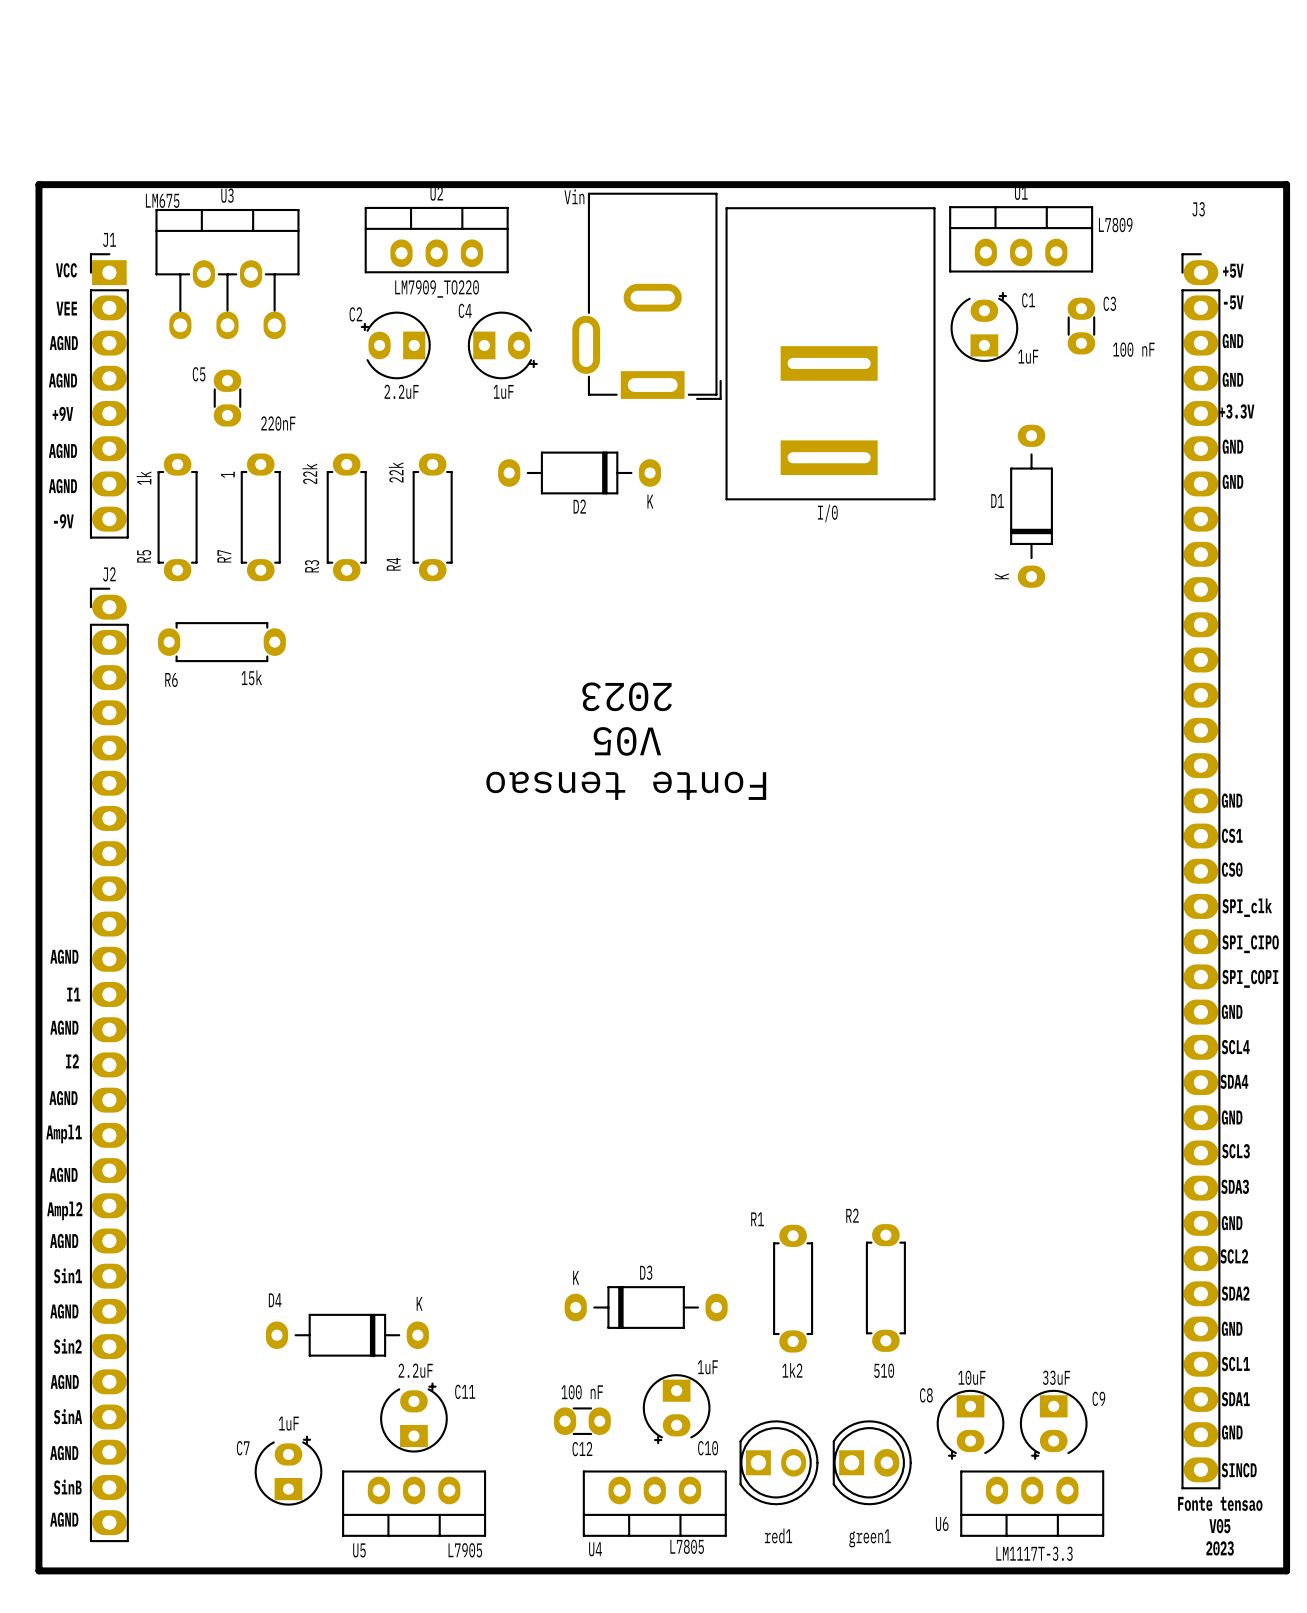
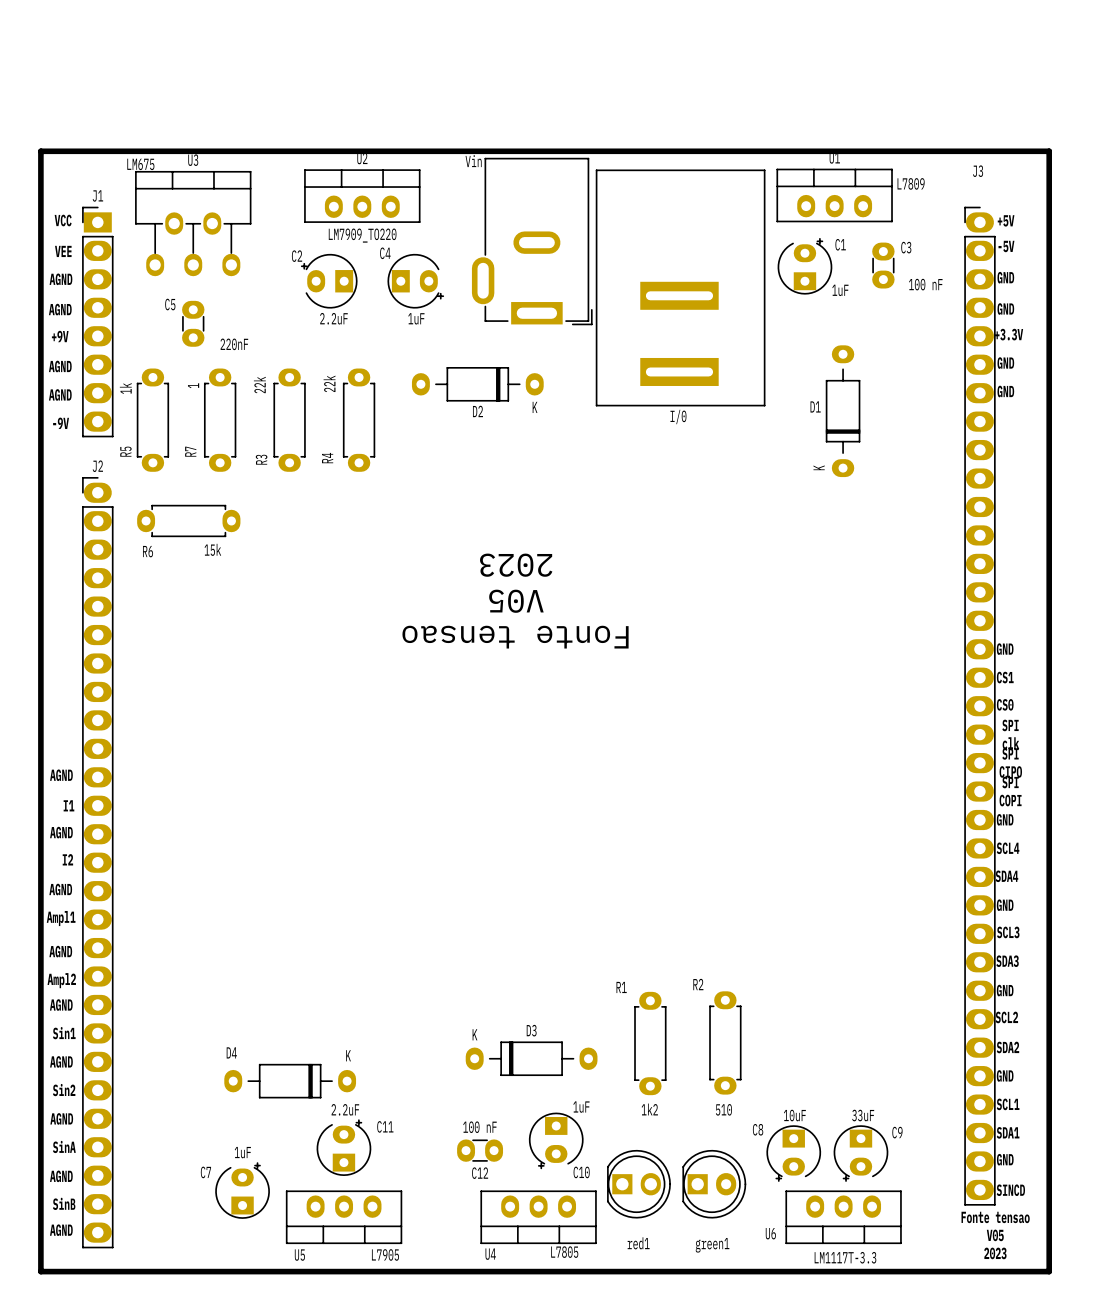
text: none -> SPI (1010, 725)
text: SPI_clk (1247, 907) -> none
text: none -> clk (1010, 743)
text: none -> SPI (1010, 753)
text: SPI_CIPO (1250, 944) -> CIPO (1010, 771)
text: none -> SPI (1010, 782)
text: SPI_COPI (1250, 978) -> COPI (1010, 800)

